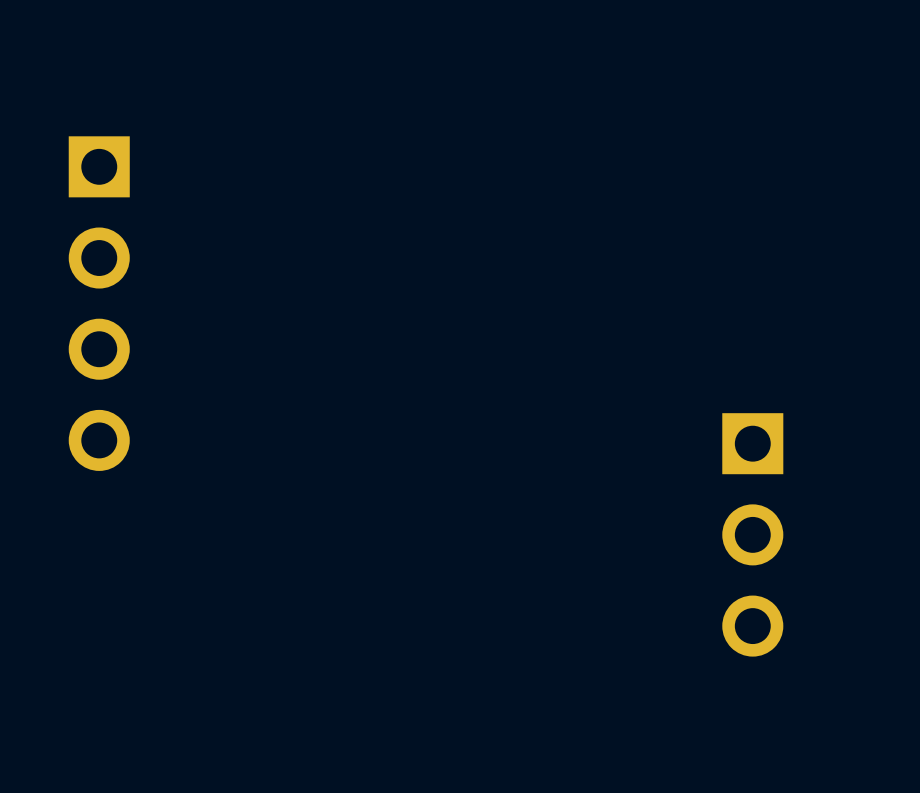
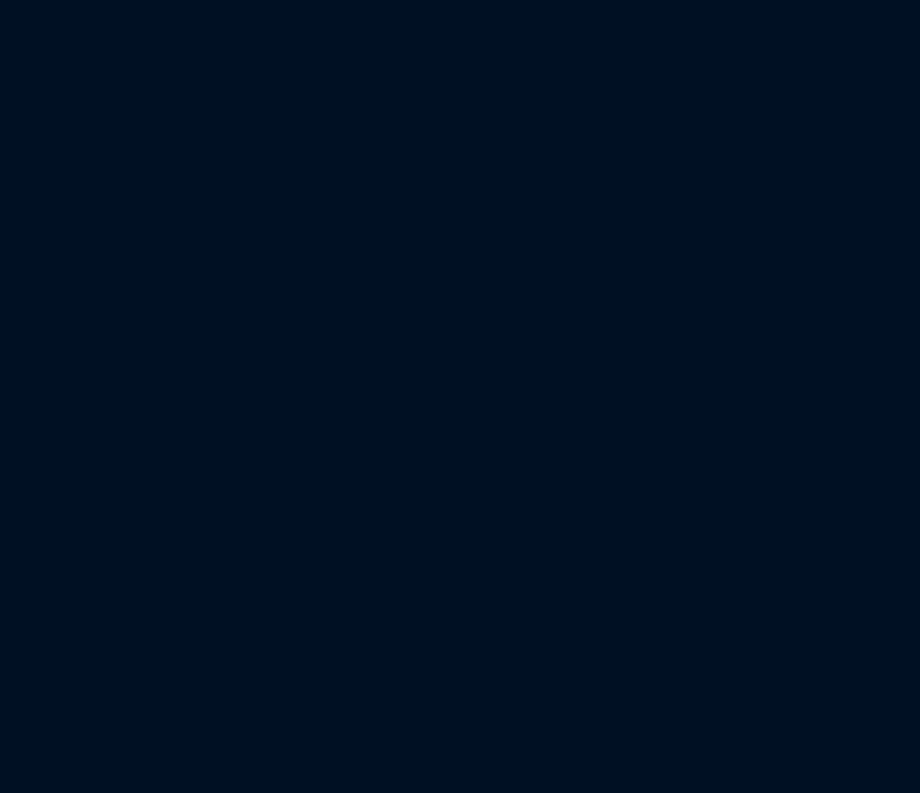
part: (99, 303) -> none
part: (752, 534) -> none

